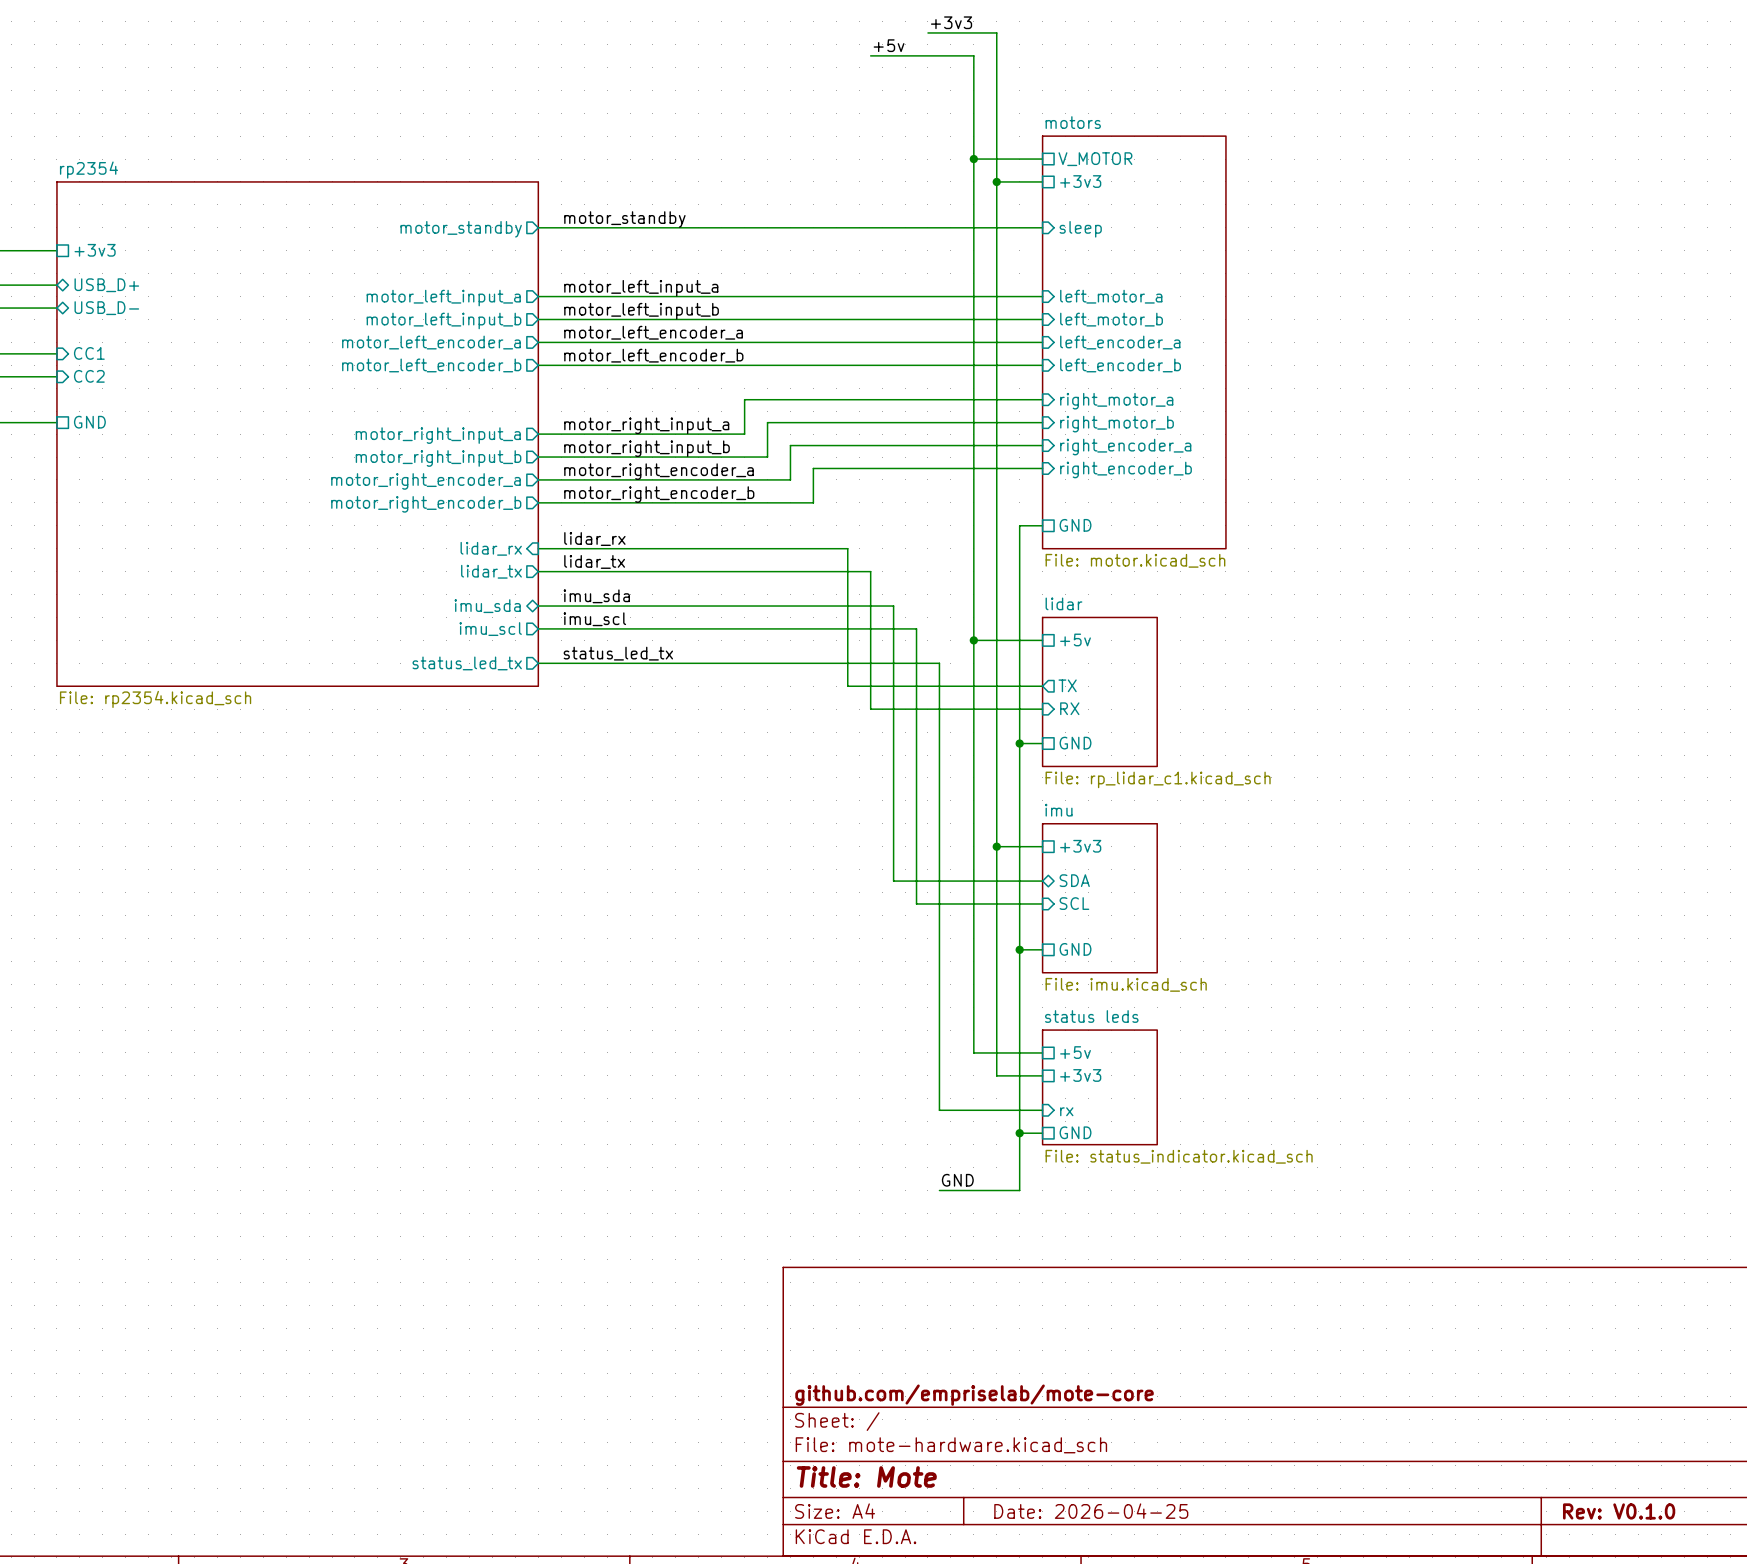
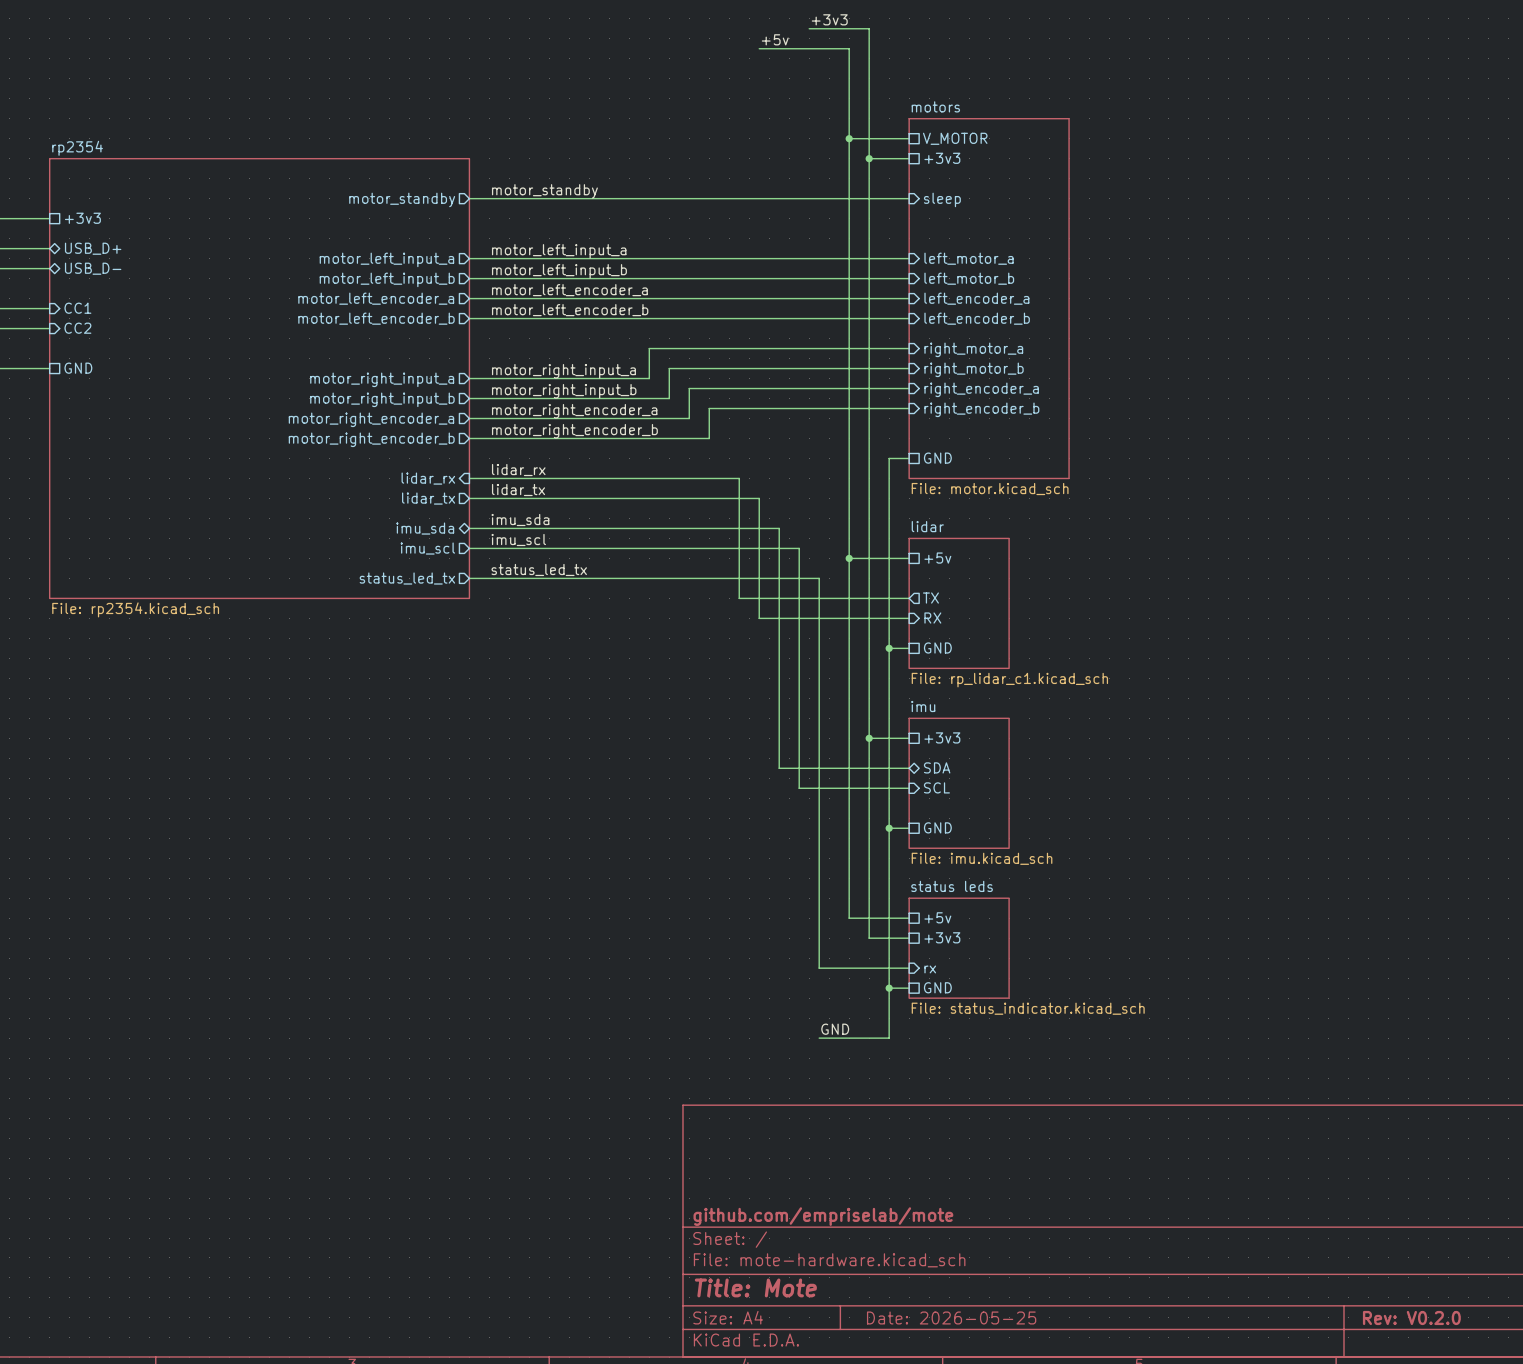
title block: github.com/empriselab/mote-core (974, 1395) -> github.com/empriselab/mote (823, 1216)
title block: Date: 2026-04-25 (1091, 1511) -> Date: 2026-05-25 (951, 1317)
title block: Rev: V0.1.0 (1619, 1511) -> Rev: V0.2.0 (1411, 1317)

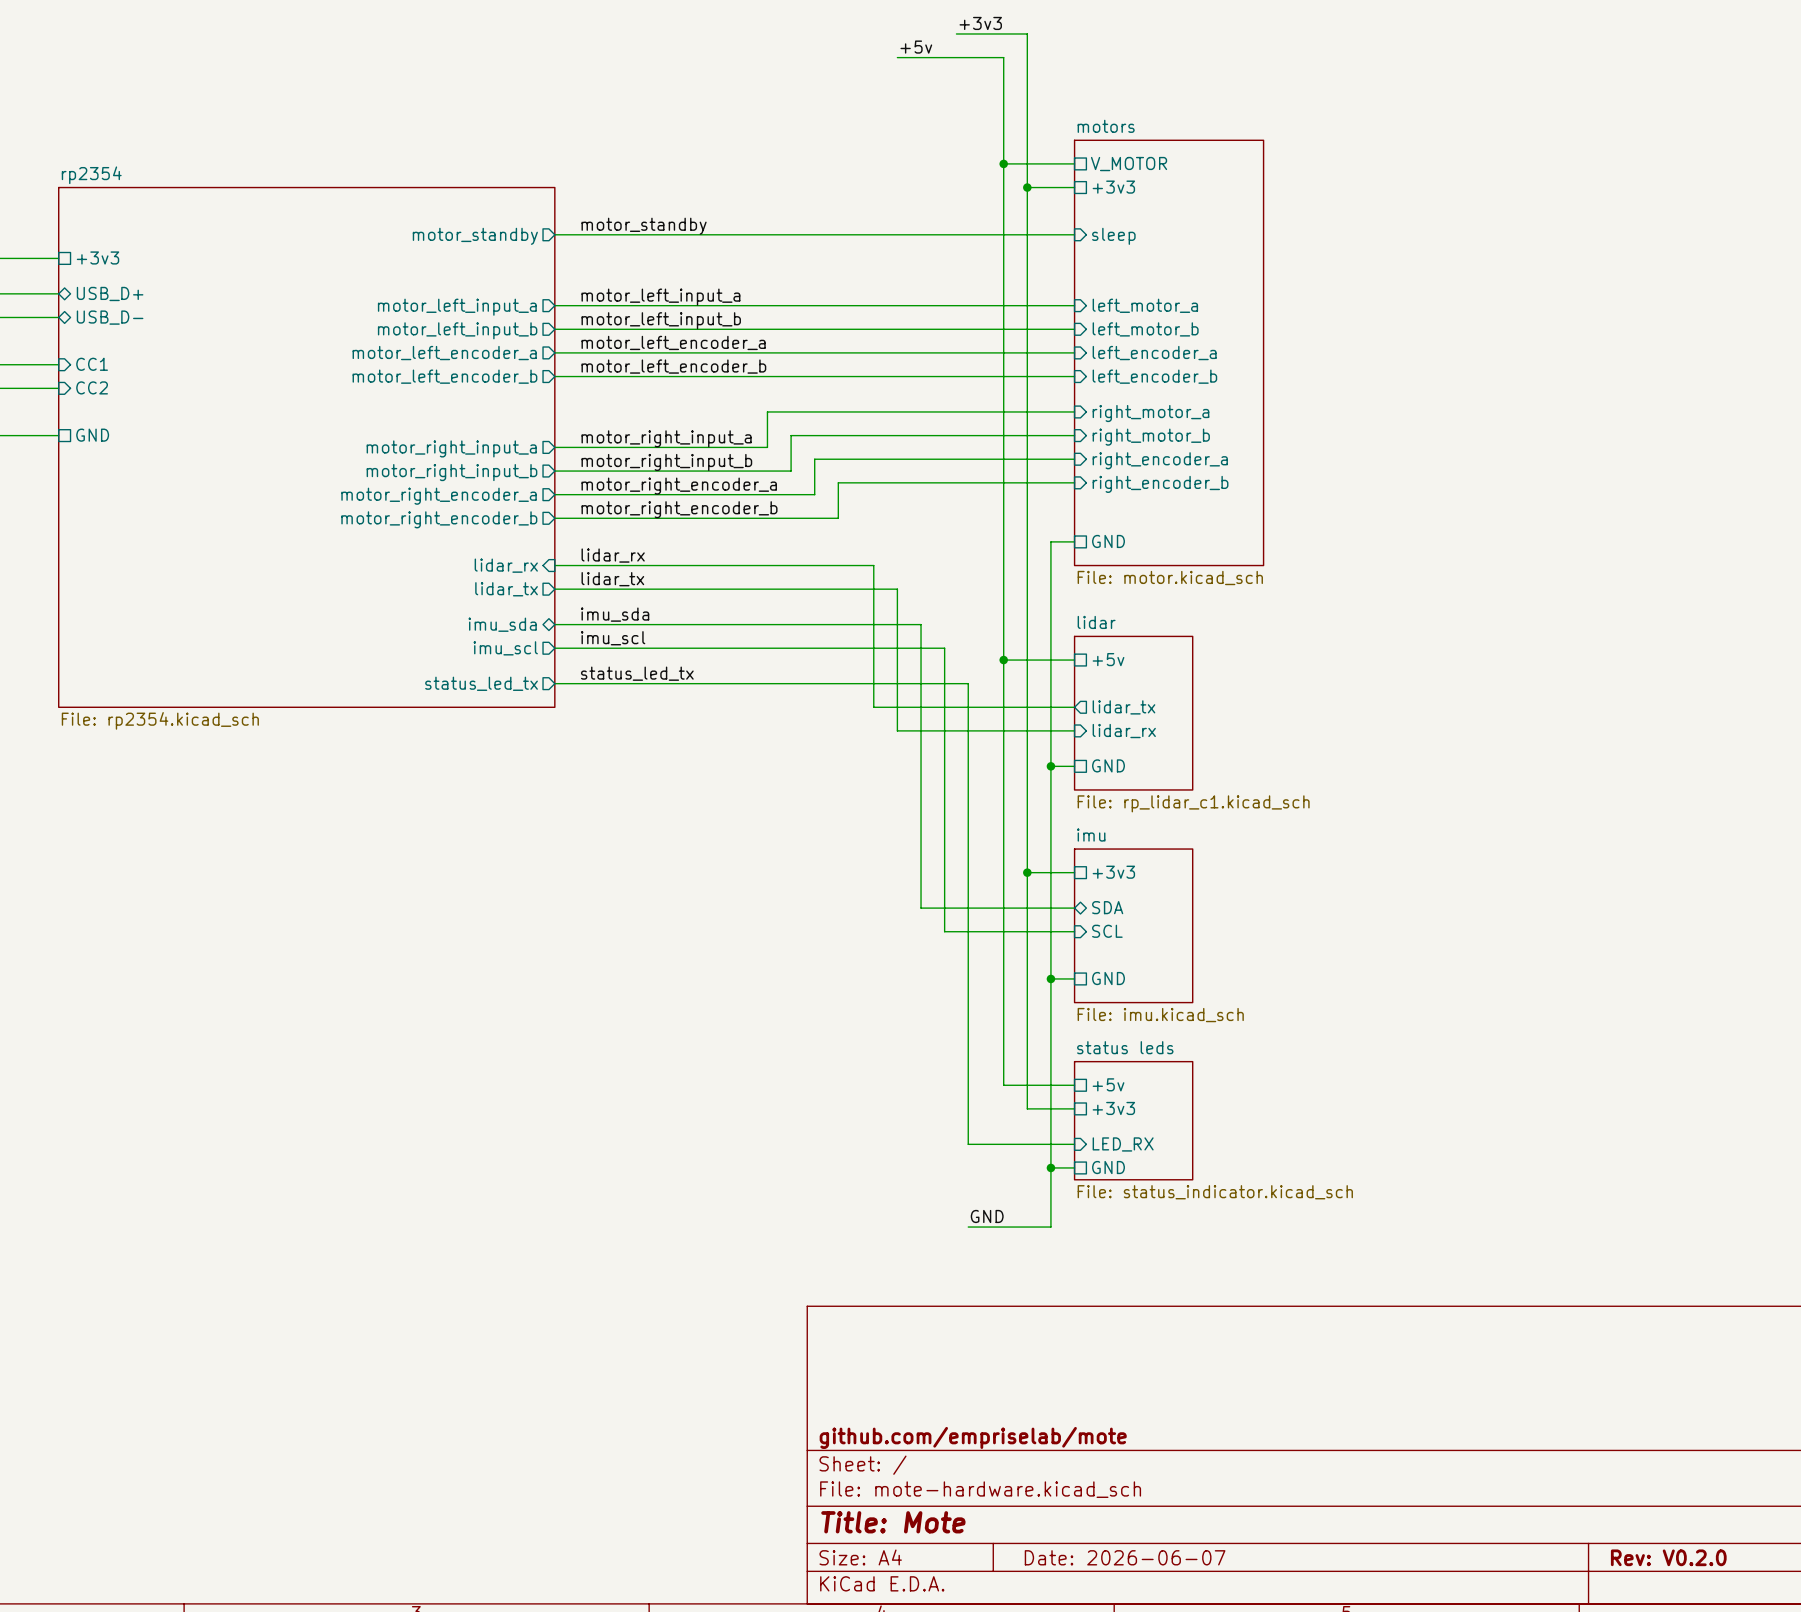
sheet pin: TX (930, 598) -> lidar_tx (1123, 707)
sheet pin: RX (932, 618) -> lidar_rx (1124, 731)
sheet pin: rx (930, 969) -> LED_RX (1123, 1144)
title block: Date: 2026-05-25 (951, 1317) -> Date: 2026-06-07 (1125, 1557)

